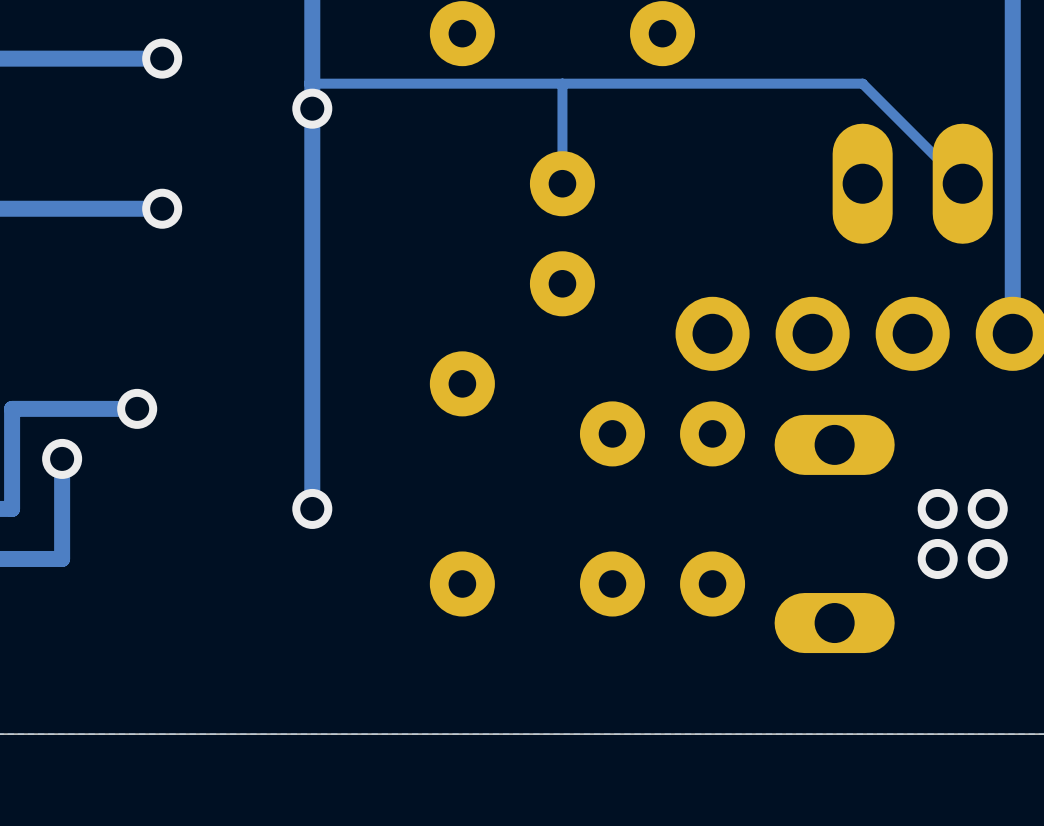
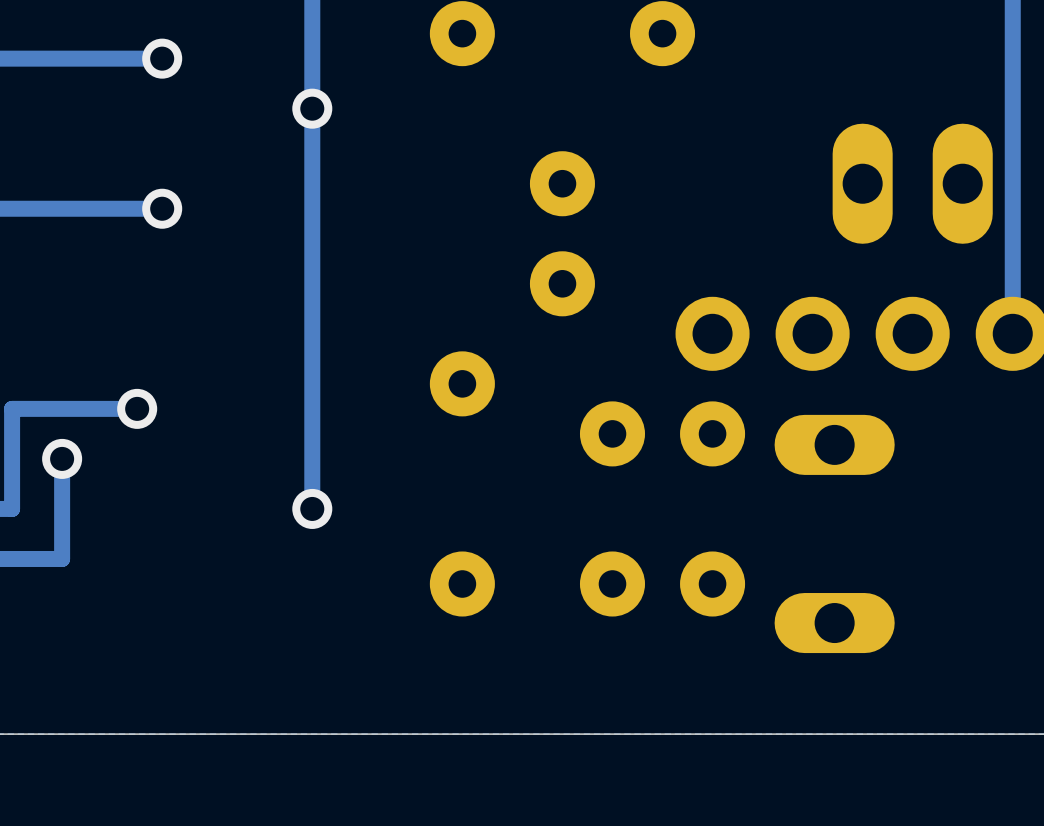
track: (312, 83) (862, 83) (962, 183) -> none
track: (562, 83) (562, 183) -> none
via: (937, 508) -> none
via: (987, 508) -> none
via: (937, 558) -> none
via: (987, 558) -> none

